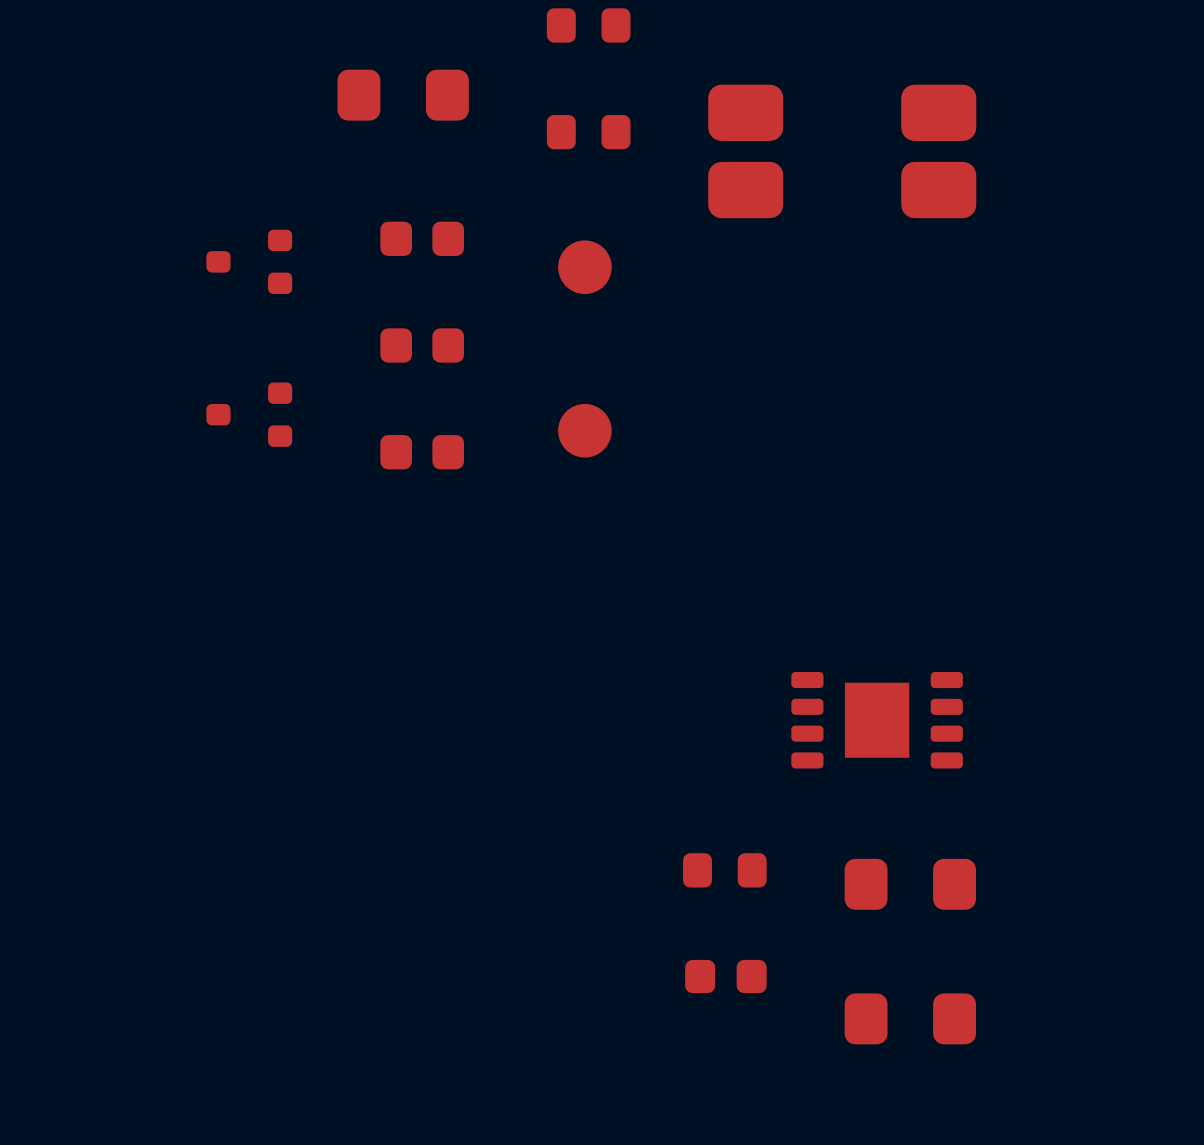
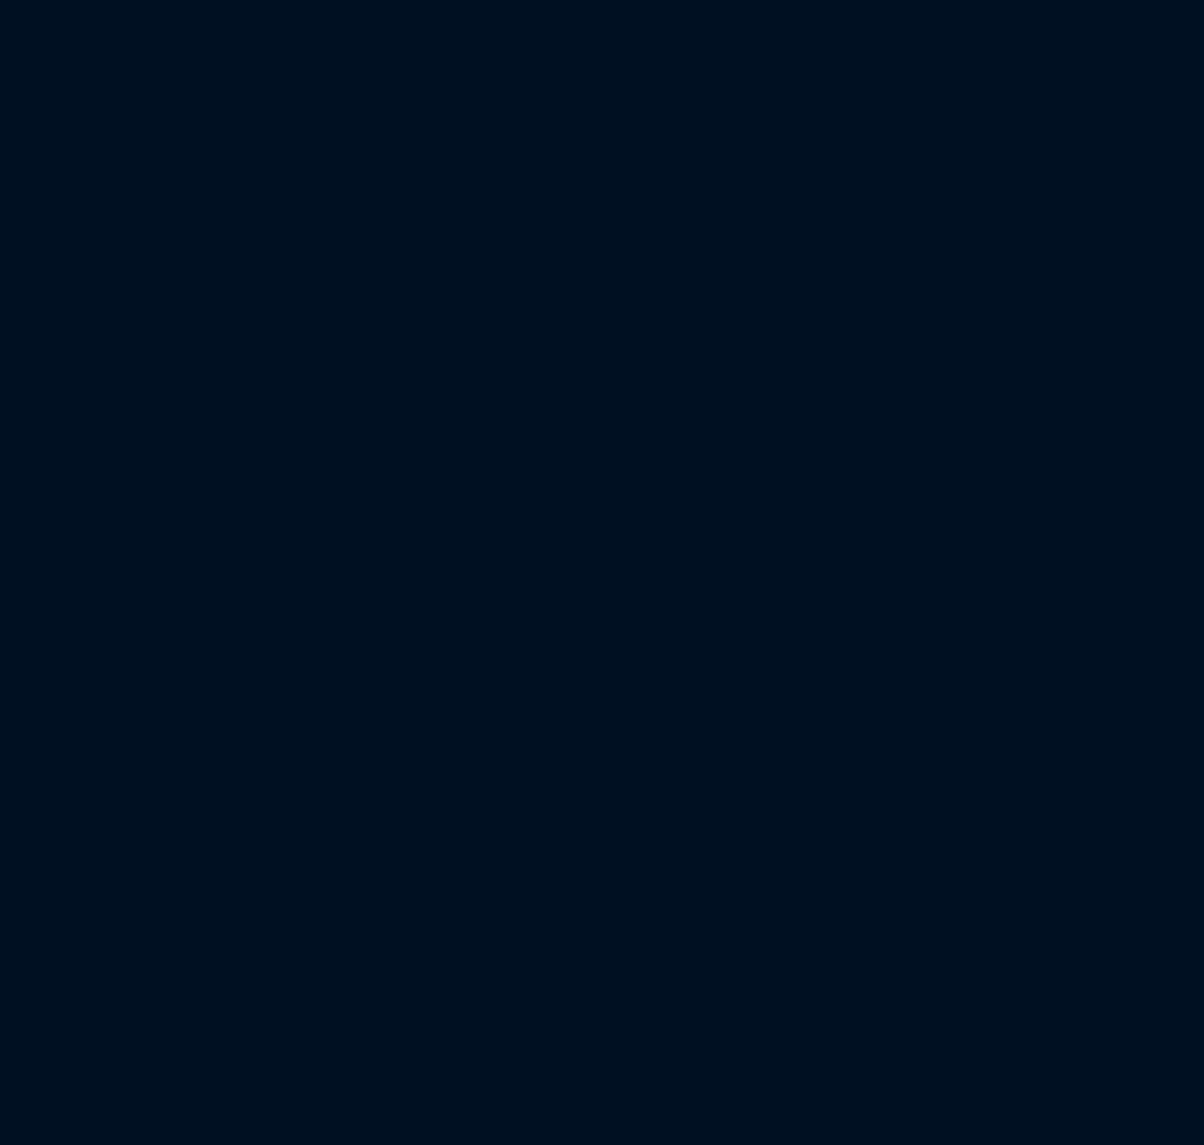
part: (588, 25) -> none
part: (403, 95) -> none
part: (588, 132) -> none
part: (842, 151) -> none
part: (422, 238) -> none
part: (249, 261) -> none
part: (584, 267) -> none
part: (422, 345) -> none
part: (249, 414) -> none
part: (584, 430) -> none
part: (422, 452) -> none
part: (877, 720) -> none
part: (724, 870) -> none
part: (910, 884) -> none
part: (725, 976) -> none
part: (910, 1018) -> none

